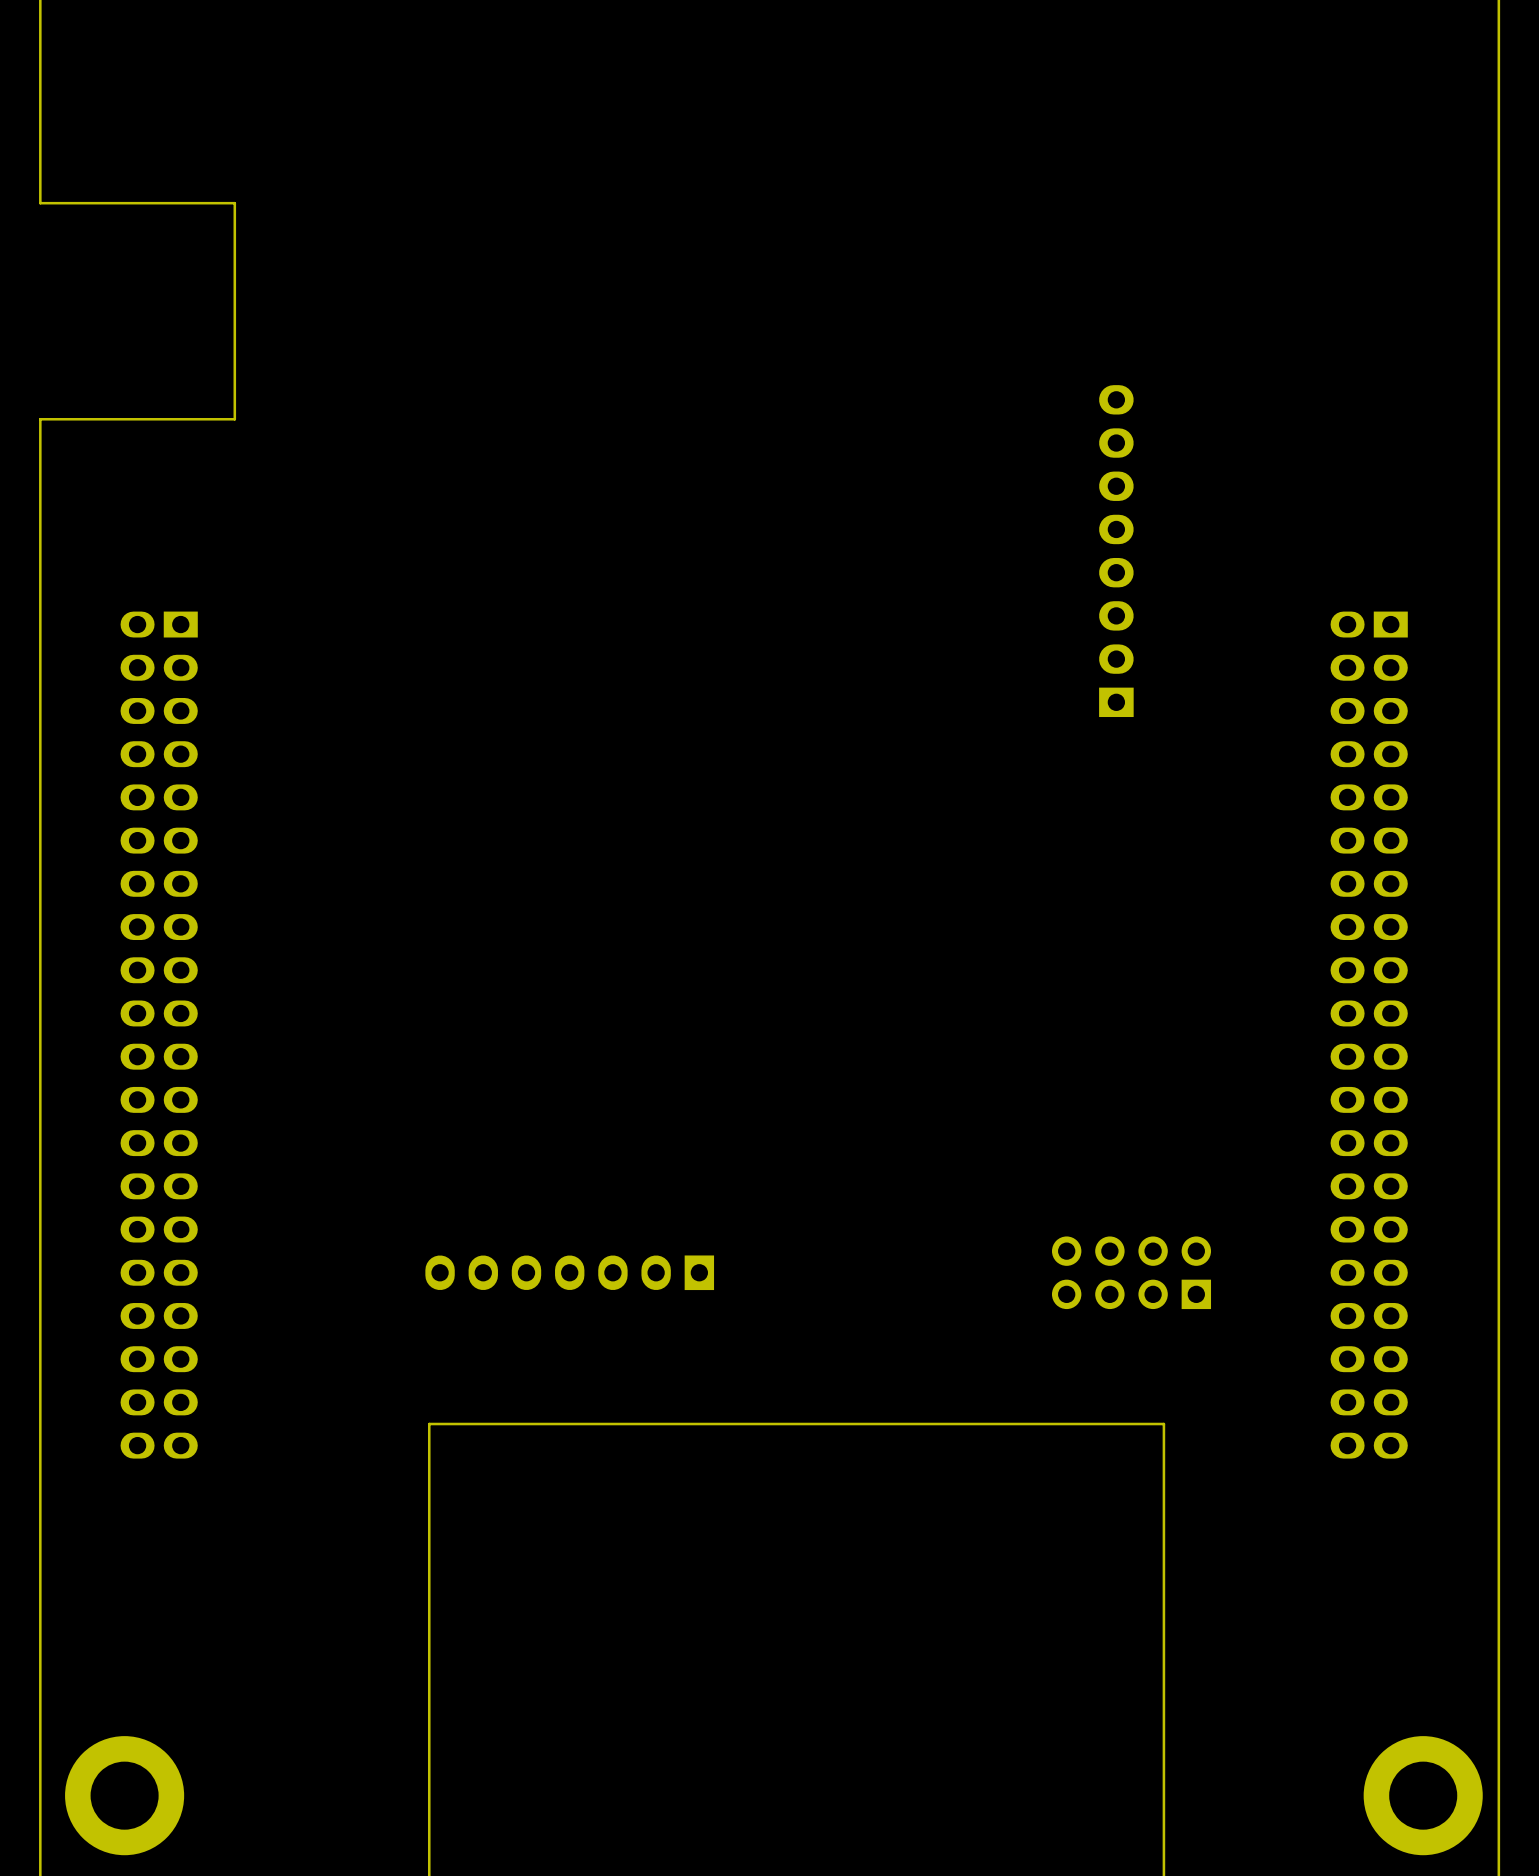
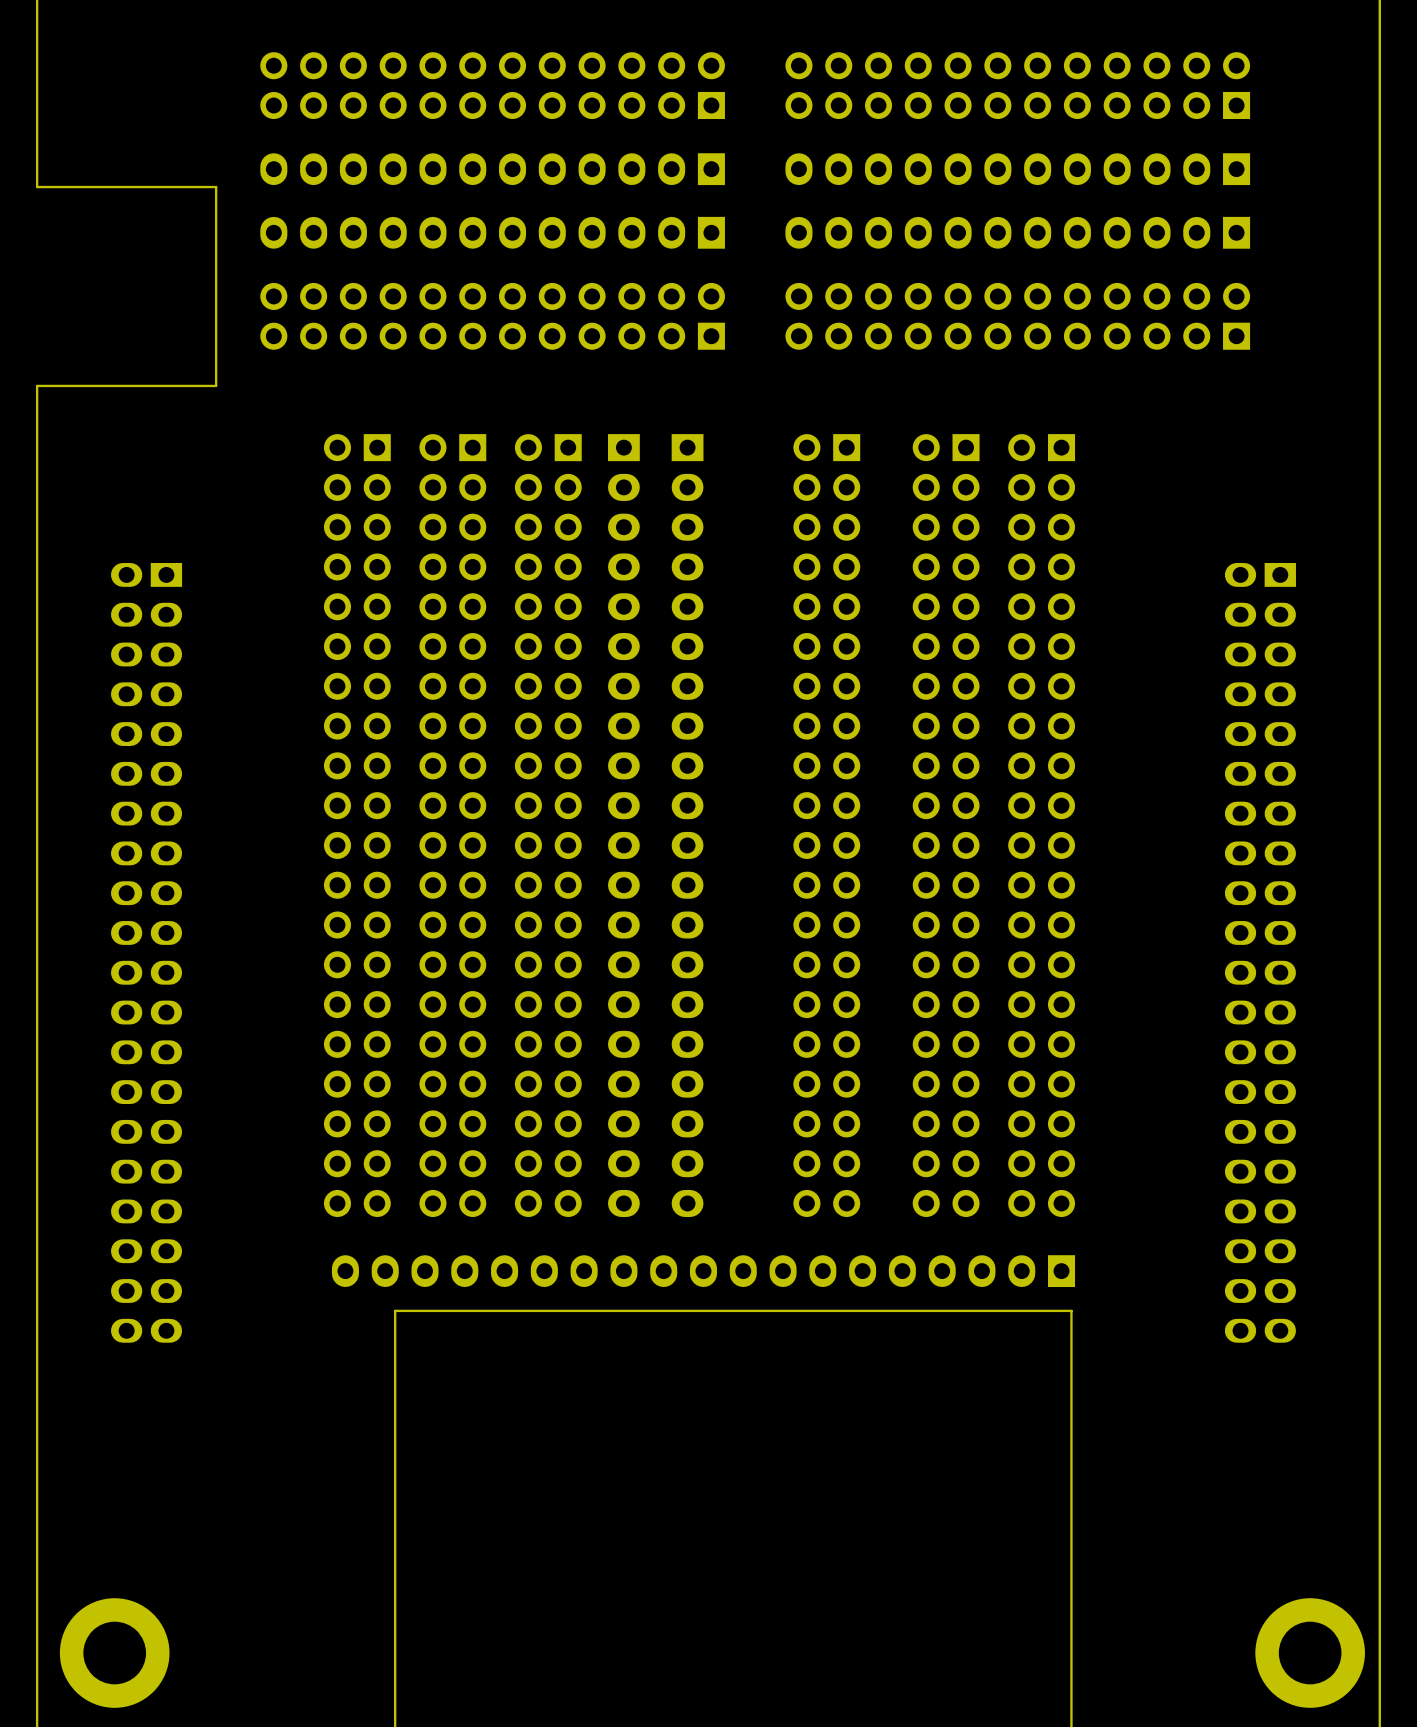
part: none -> (492, 85)
part: none -> (1017, 85)
part: none -> (492, 169)
part: none -> (1017, 169)
part: none -> (492, 232)
part: none -> (1017, 232)
part: none -> (492, 316)
part: none -> (1017, 316)
part: (1116, 551) -> none
part: none -> (357, 825)
part: none -> (452, 825)
part: none -> (548, 825)
part: none -> (623, 825)
part: none -> (687, 825)
part: none -> (826, 825)
part: none -> (946, 825)
part: none -> (1041, 825)
part: (569, 1272) -> none
part: (1131, 1272) -> none
part: none -> (703, 1271)

